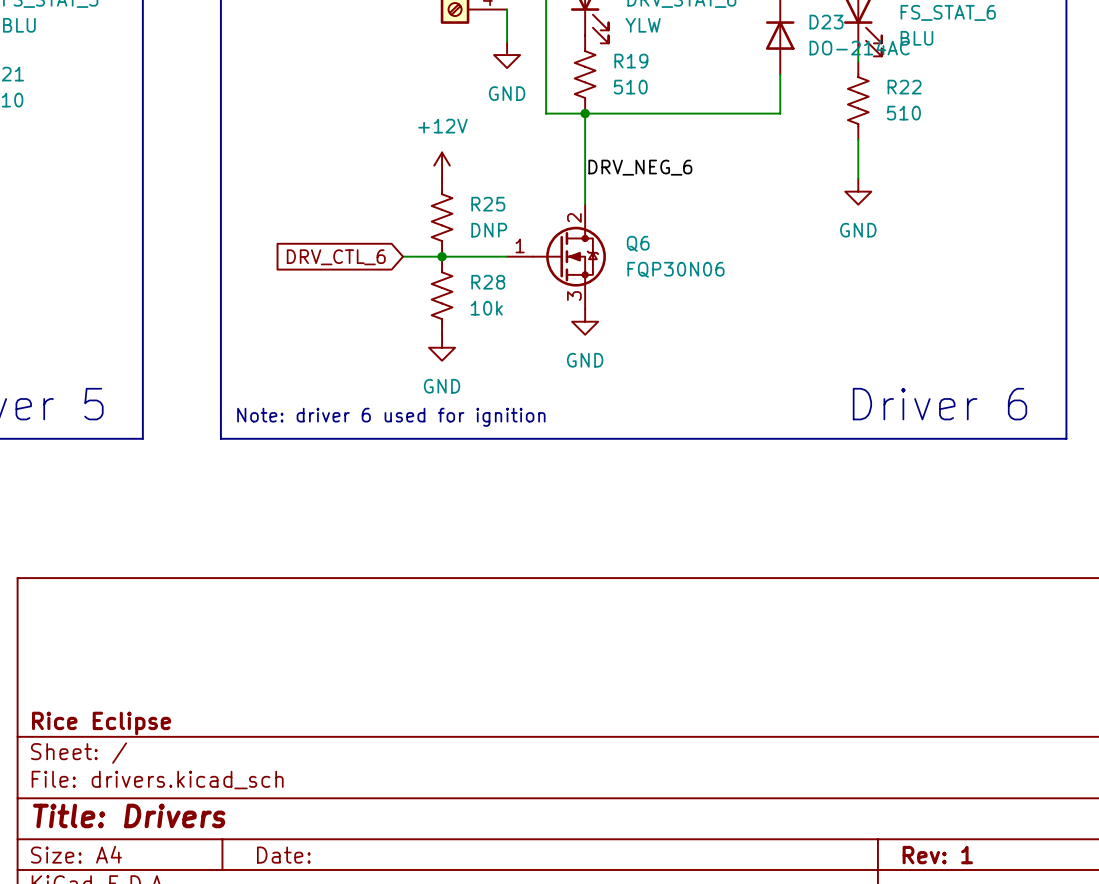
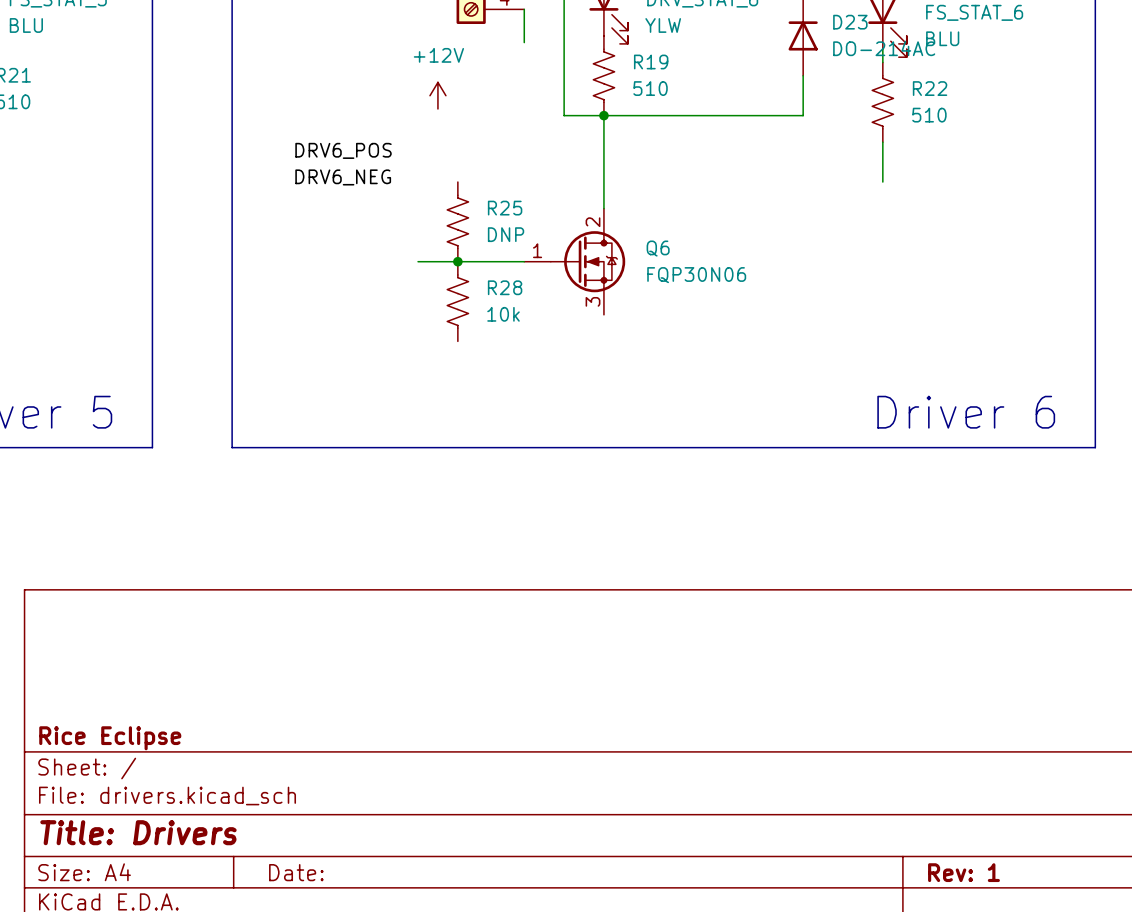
power symbol: GND (507, 55) -> none
label: none -> DRV6_POS (343, 150)
power symbol position: +12V (442, 165) -> +12V (437, 95)
label: DRV_NEG_6 (640, 167) -> none
label: none -> DRV6_NEG (343, 177)
power symbol: GND (858, 191) -> none
global label: DRV_CTL_6 (336, 257) -> none
power symbol: GND (585, 321) -> none
power symbol: GND (442, 347) -> none
text: Note: driver 6 used for ignition (391, 417) -> none

